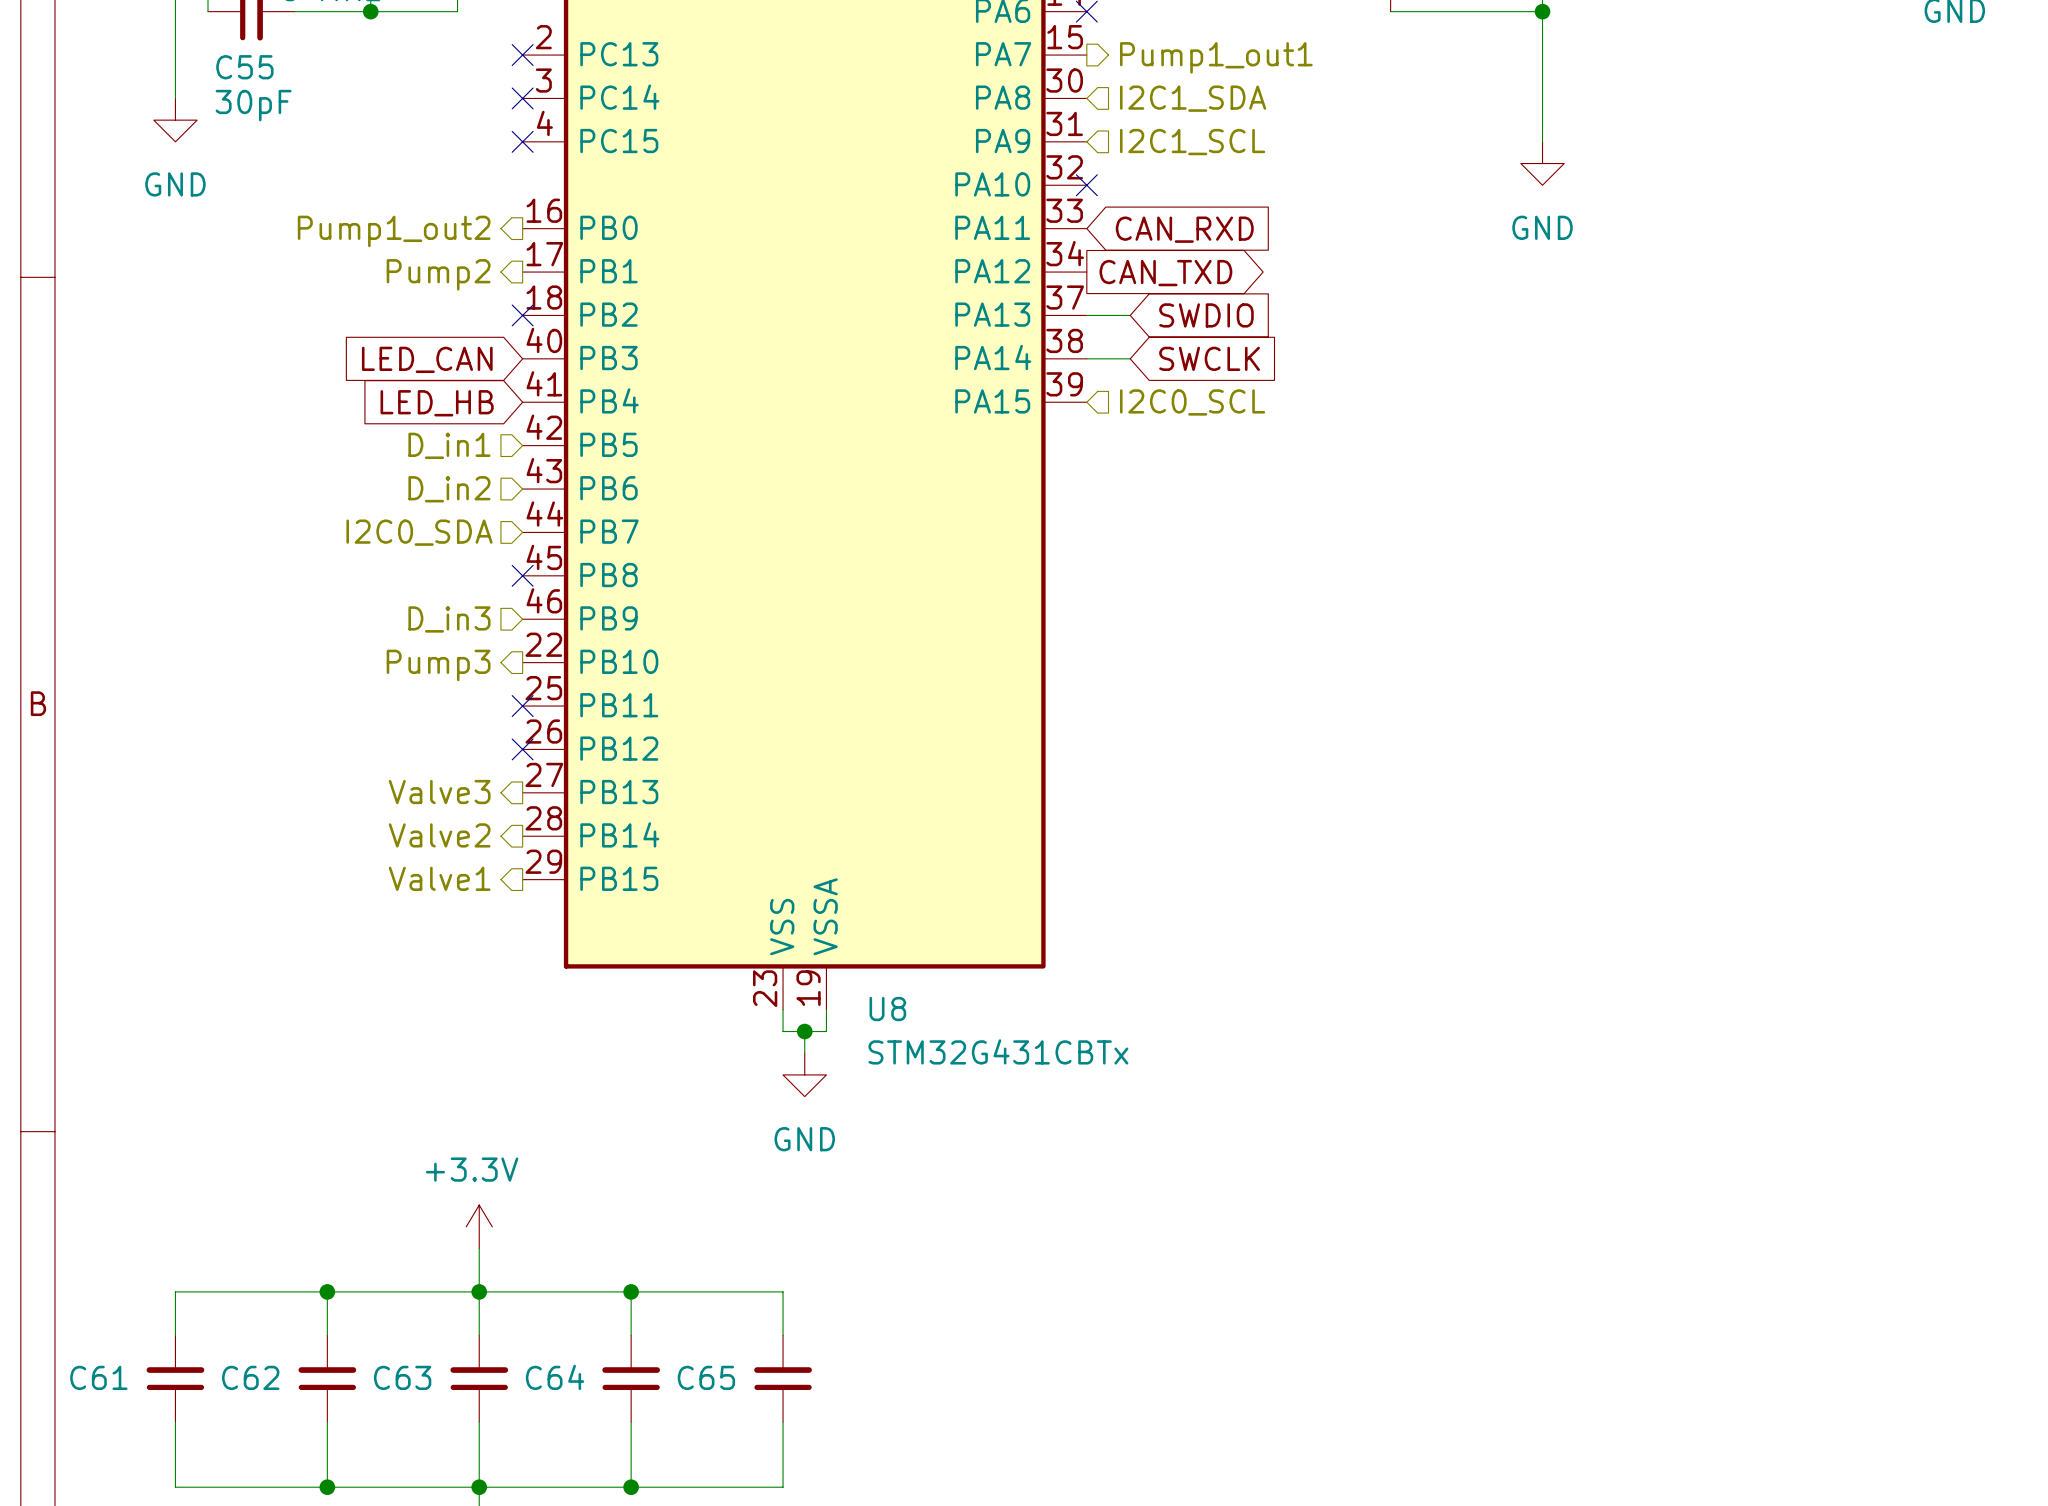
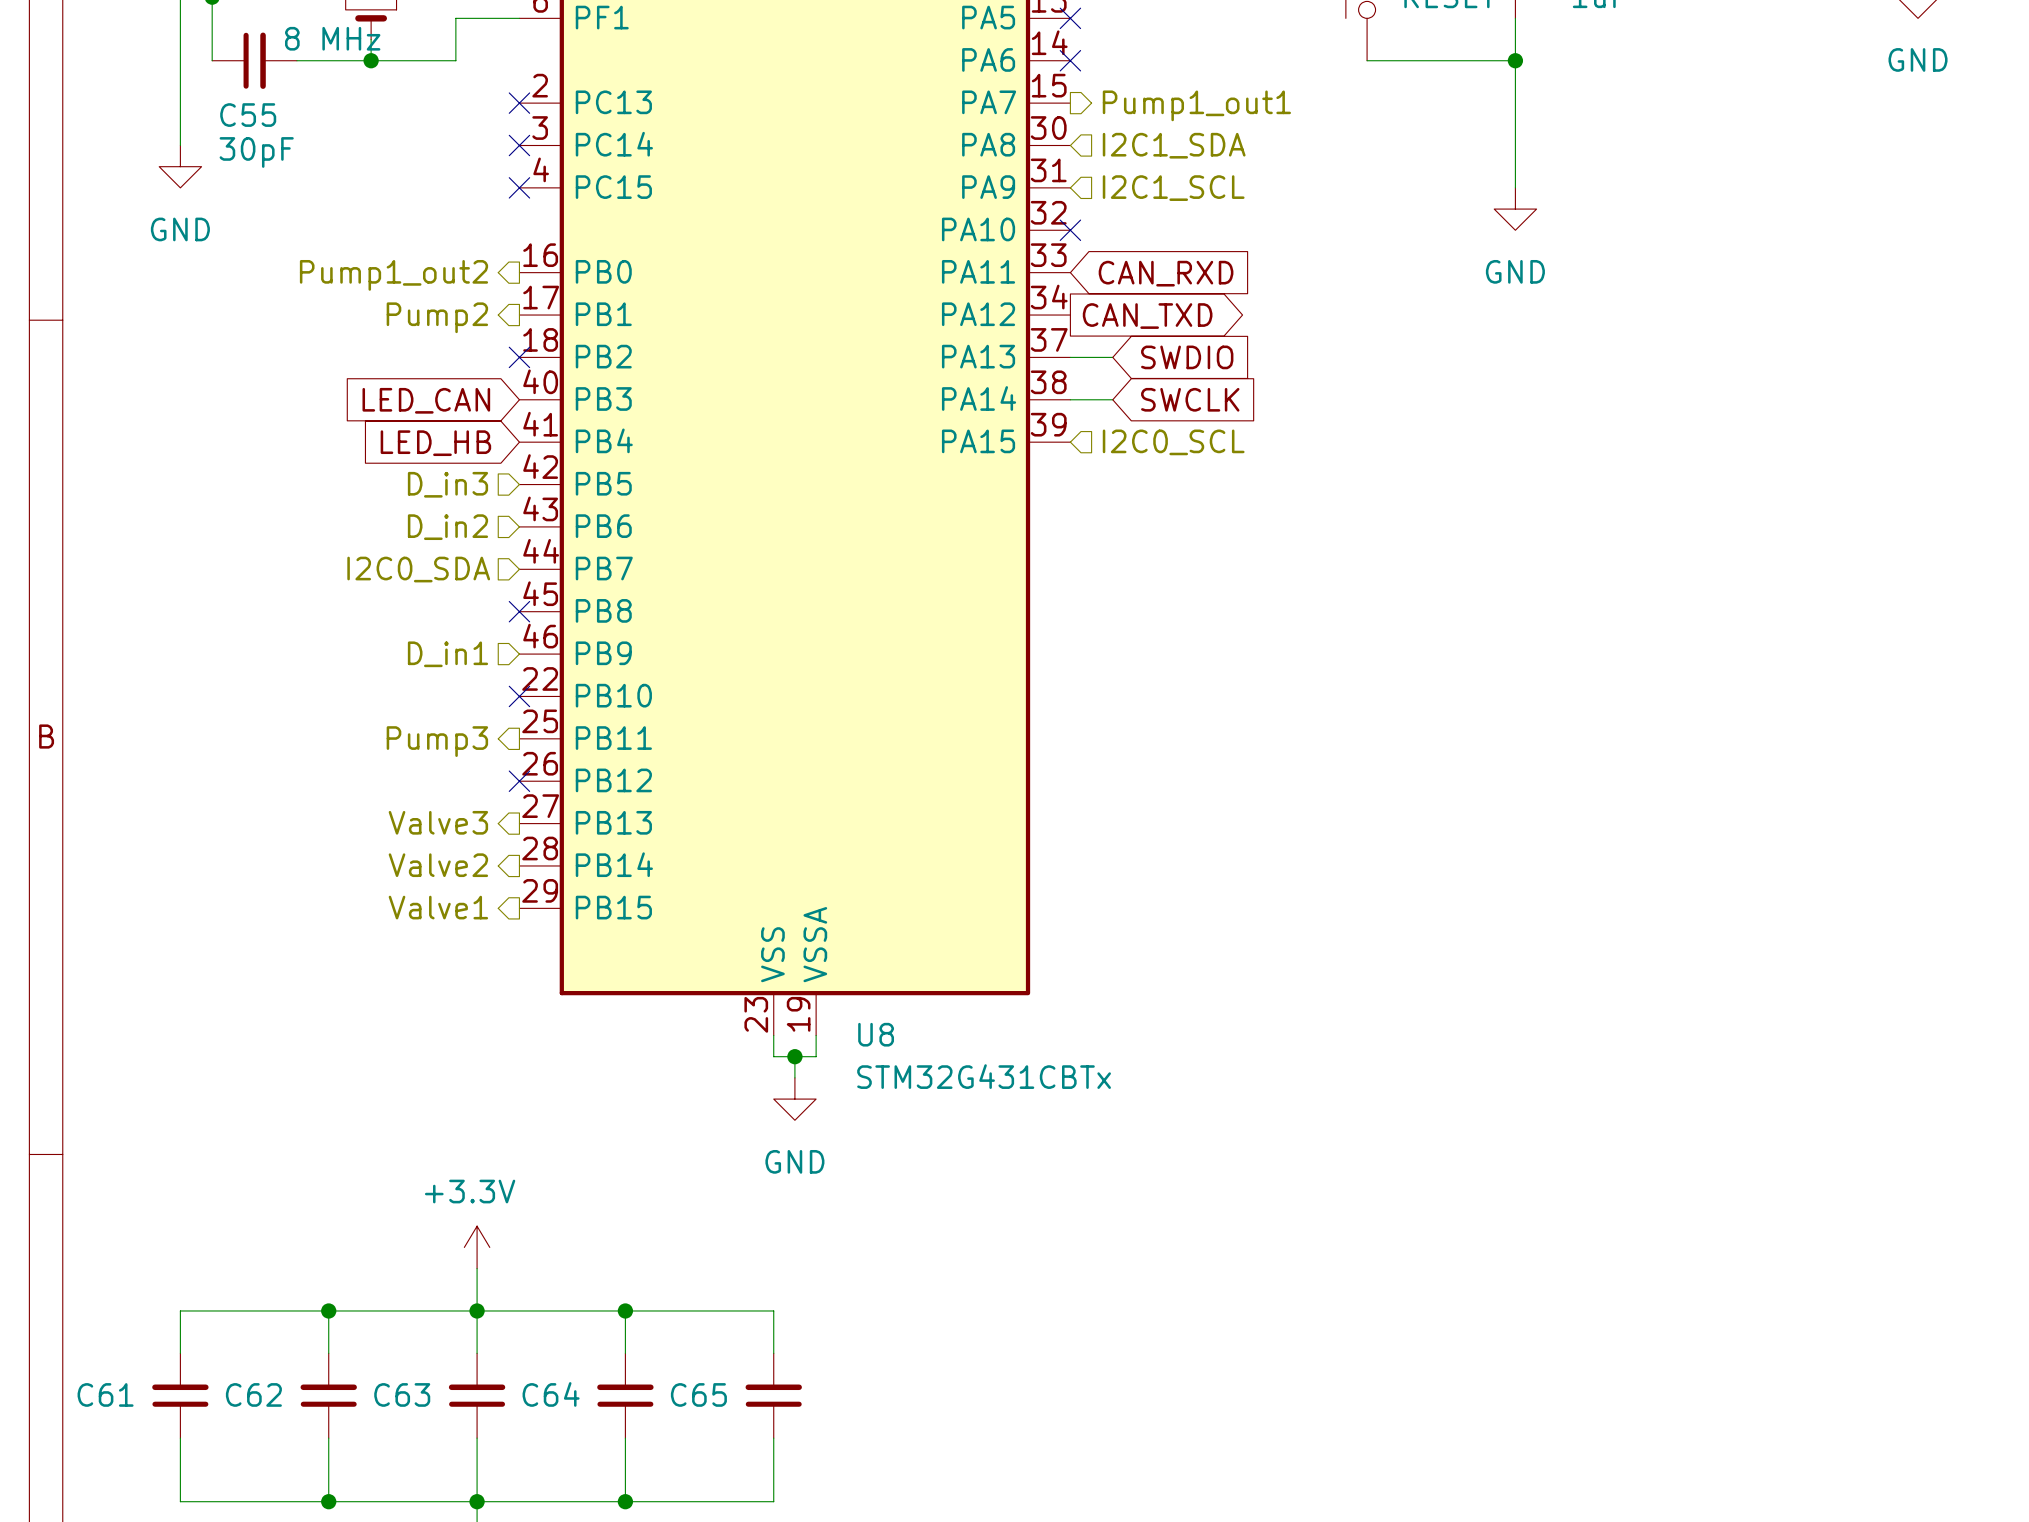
hierarchical label: D_in1 (449, 445) -> D_in3 (447, 484)
hierarchical label: D_in3 (449, 619) -> D_in1 (447, 654)
hierarchical label position: Pump3 (438, 665) -> Pump3 (437, 741)
no-connect mark position: (522, 706) -> (519, 696)

